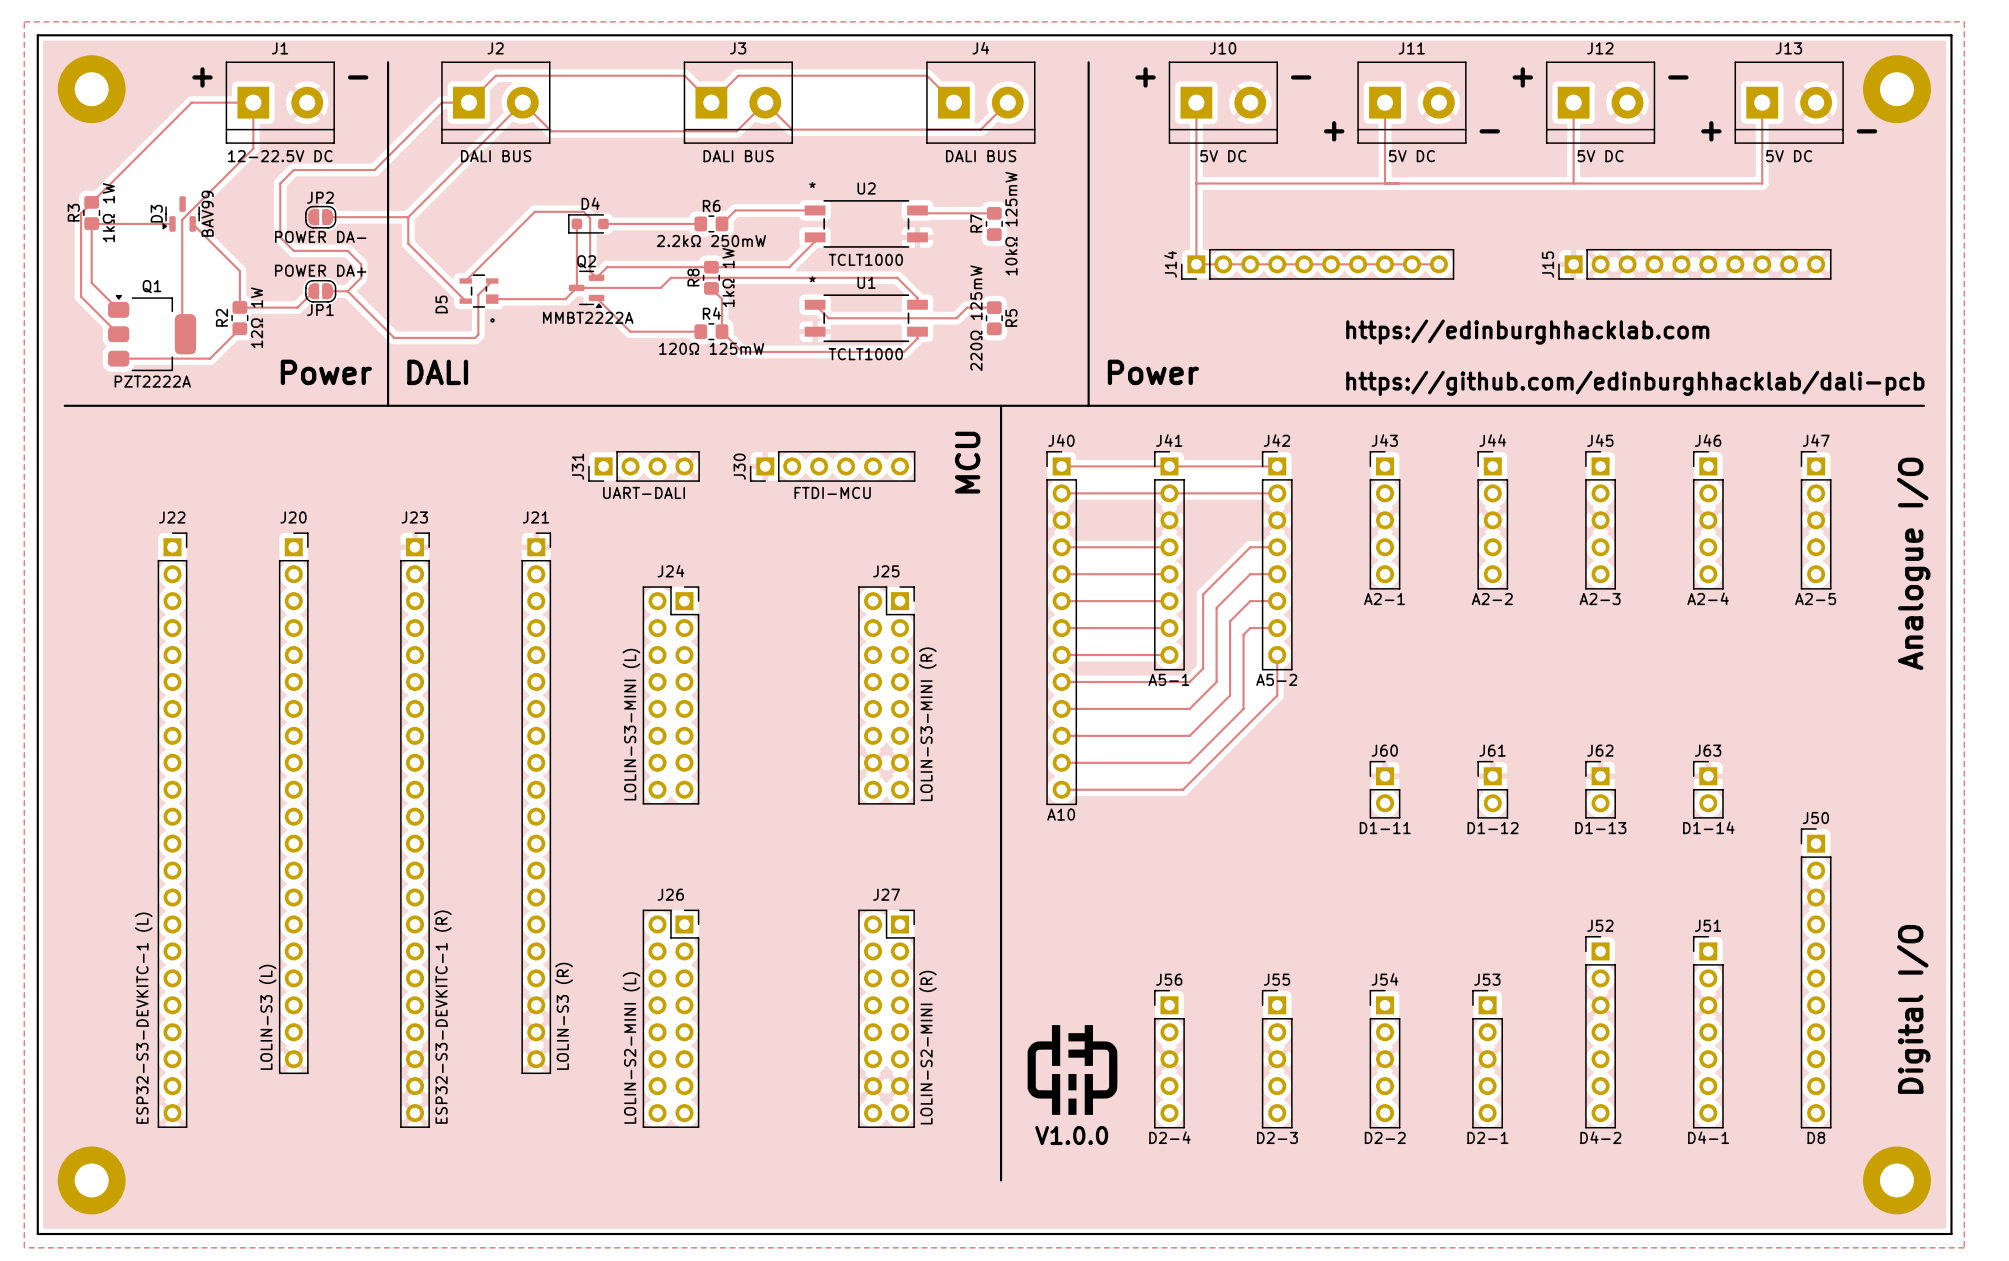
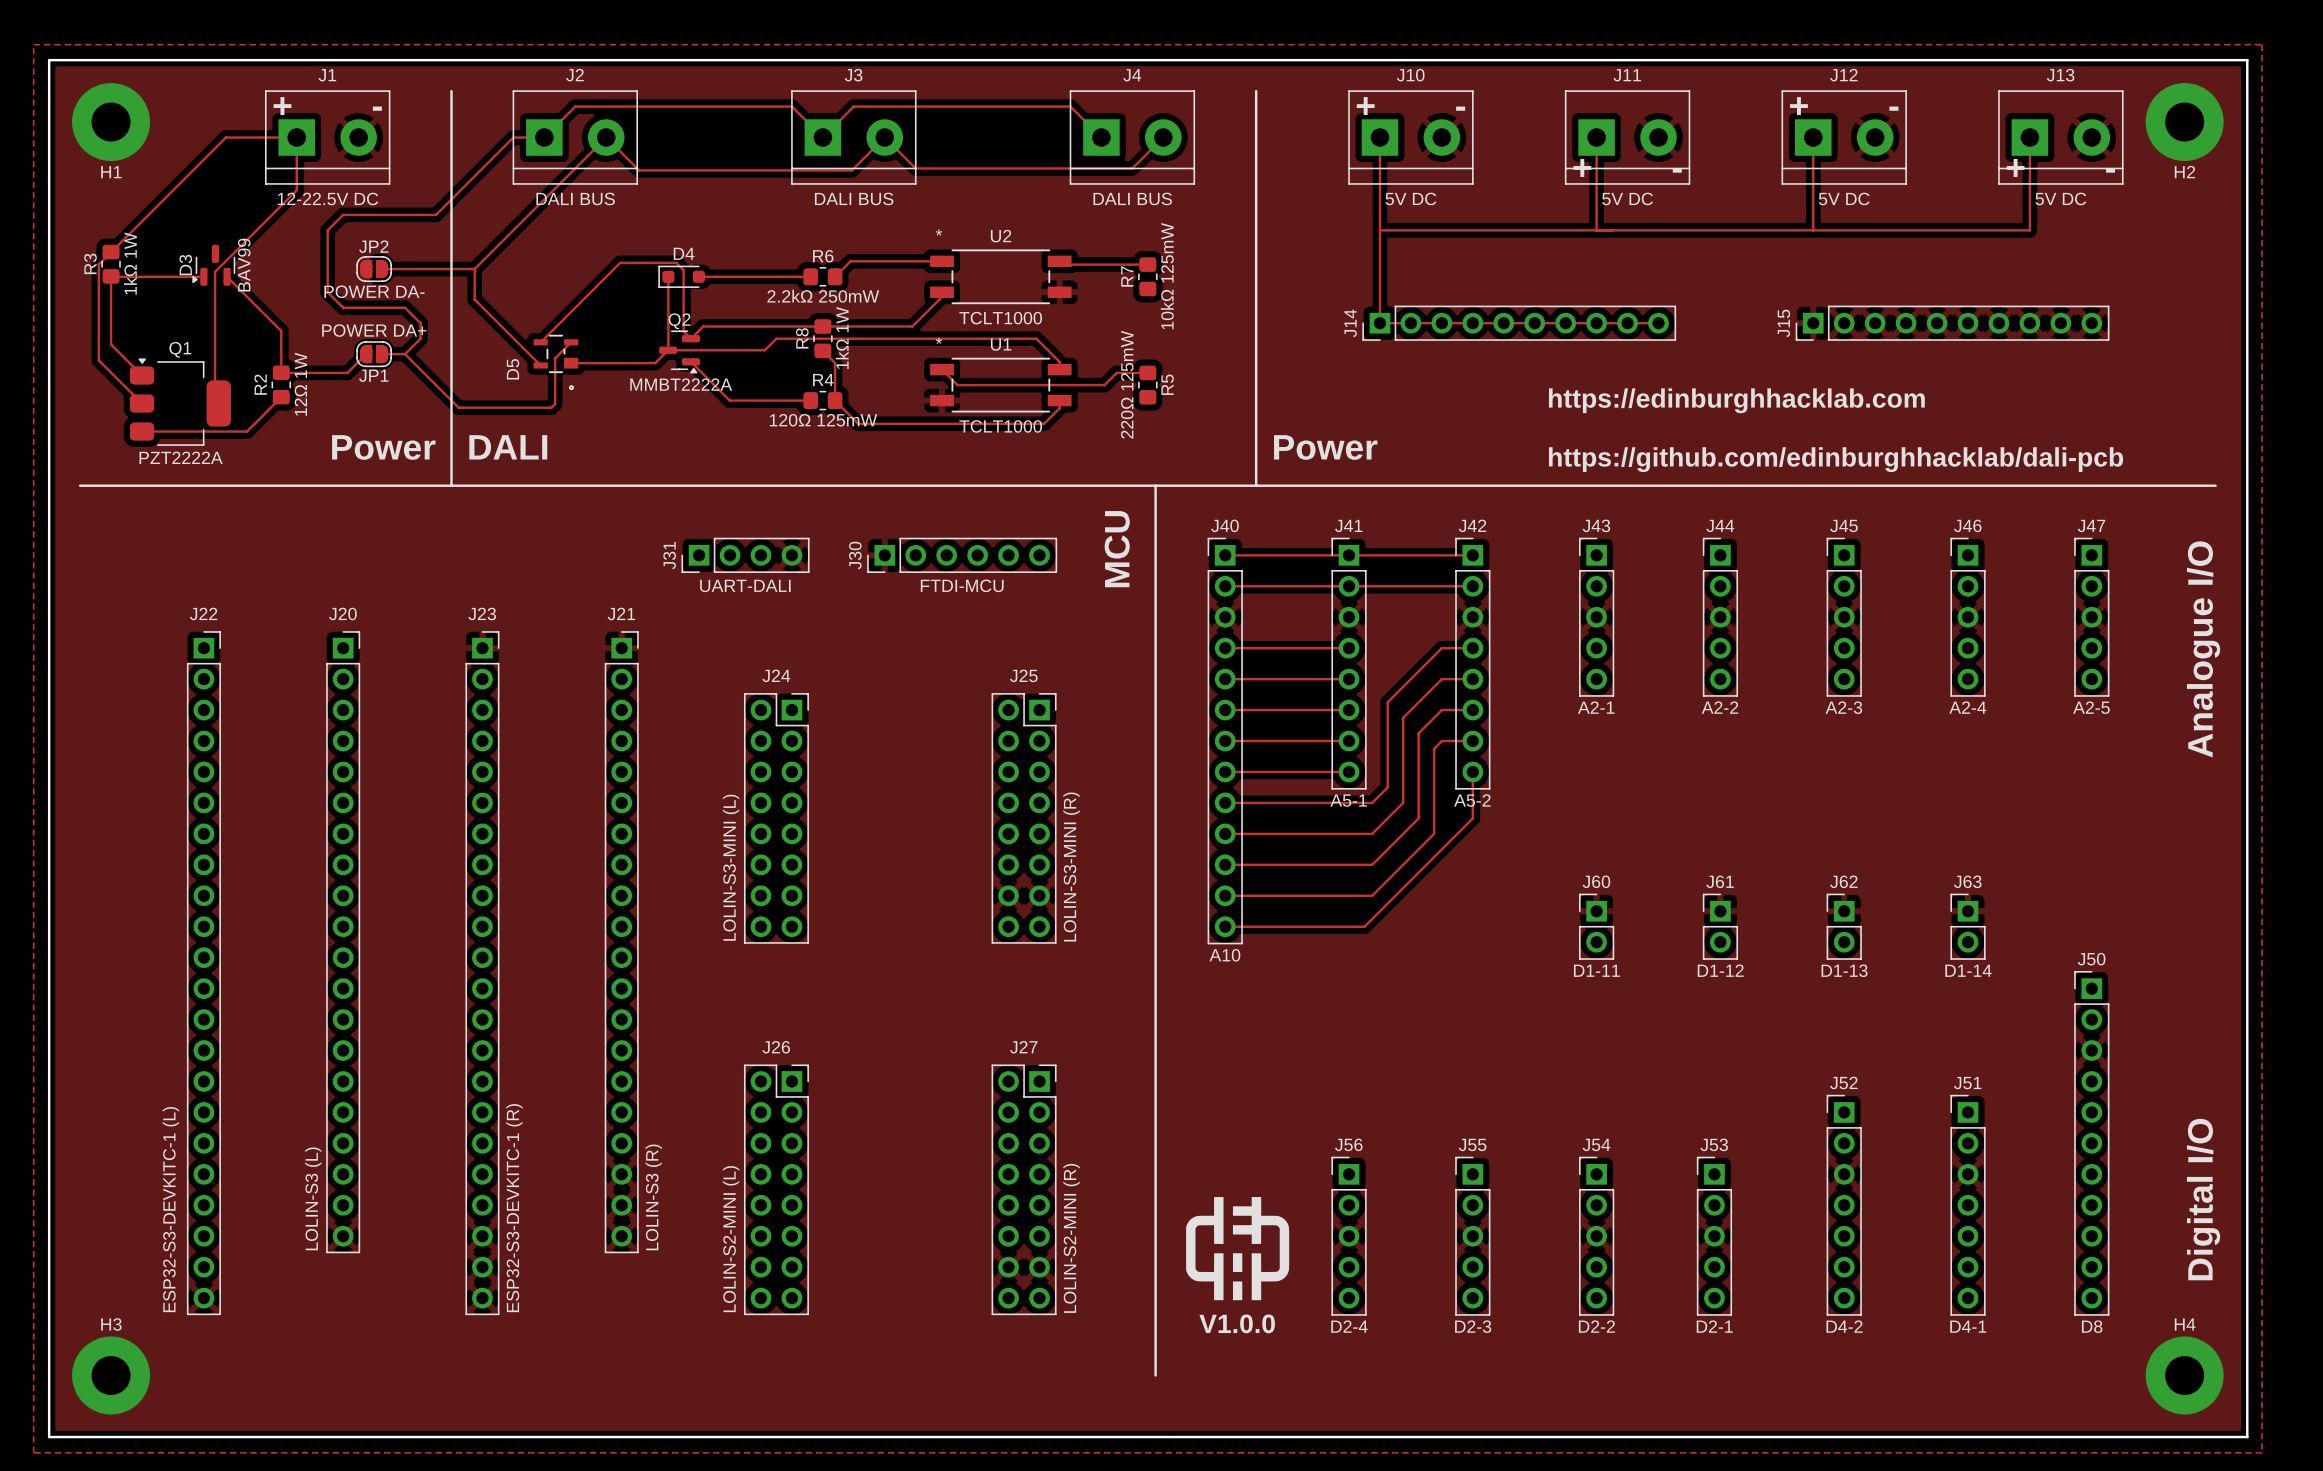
H1 name: none -> H1 (111, 172)
H2 name: none -> H2 (2184, 172)
H4 name: none -> H4 (2185, 1324)
H3 name: none -> H3 (111, 1324)

